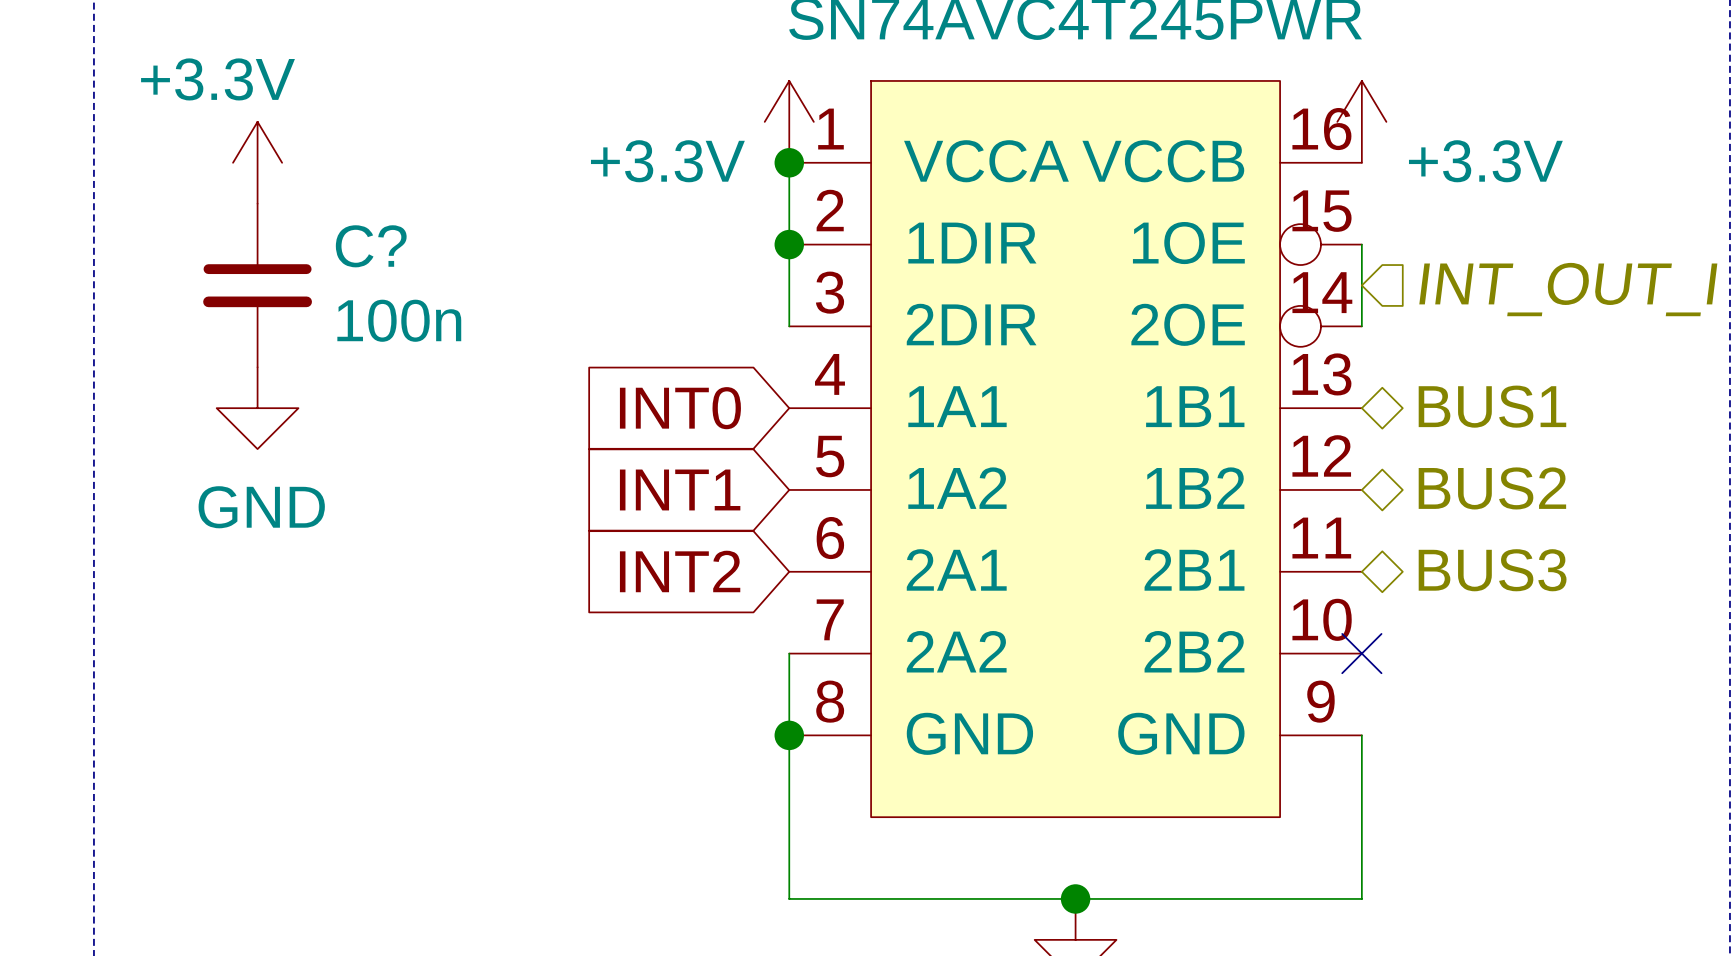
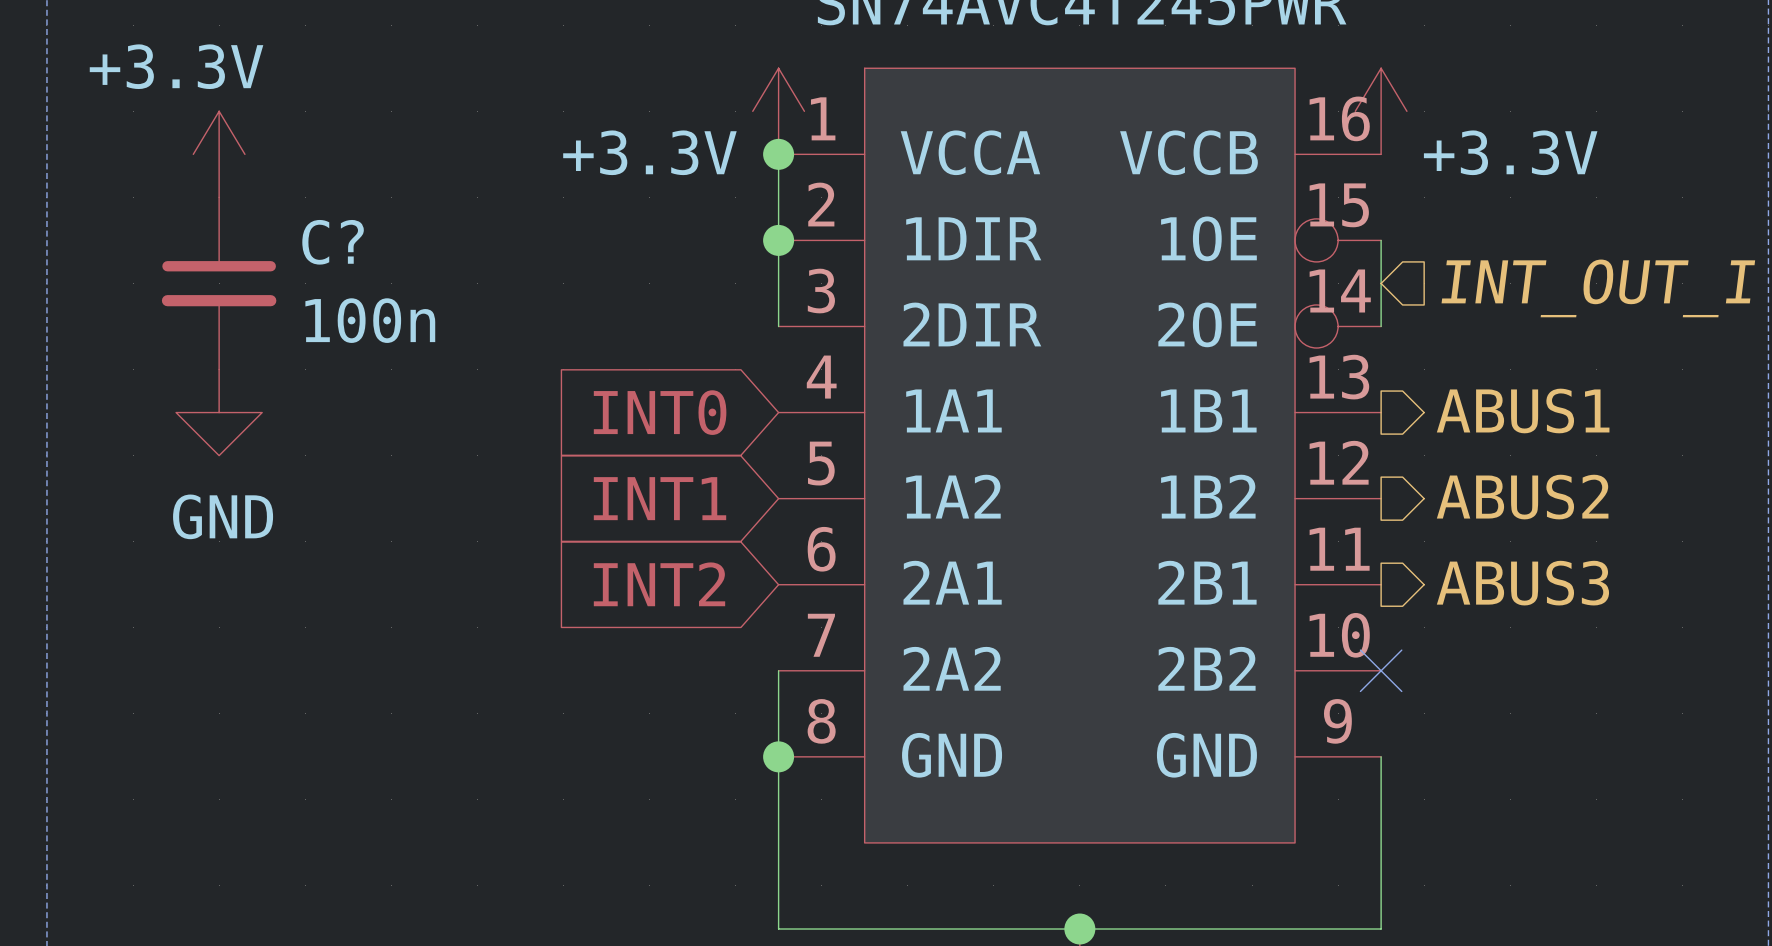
hierarchical label shape: bidirectional (1492, 406) -> output (1523, 410)
hierarchical label: BUS1 (1492, 406) -> ABUS1 (1523, 410)
hierarchical label shape: bidirectional (1492, 488) -> output (1522, 497)
hierarchical label: BUS2 (1492, 488) -> ABUS2 (1522, 497)
hierarchical label shape: bidirectional (1492, 570) -> output (1522, 583)
hierarchical label: BUS3 (1492, 570) -> ABUS3 (1522, 583)

